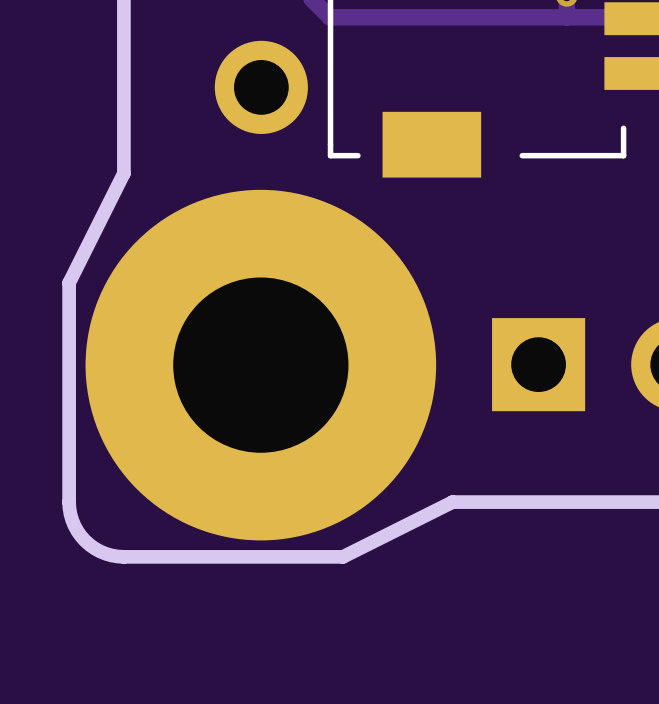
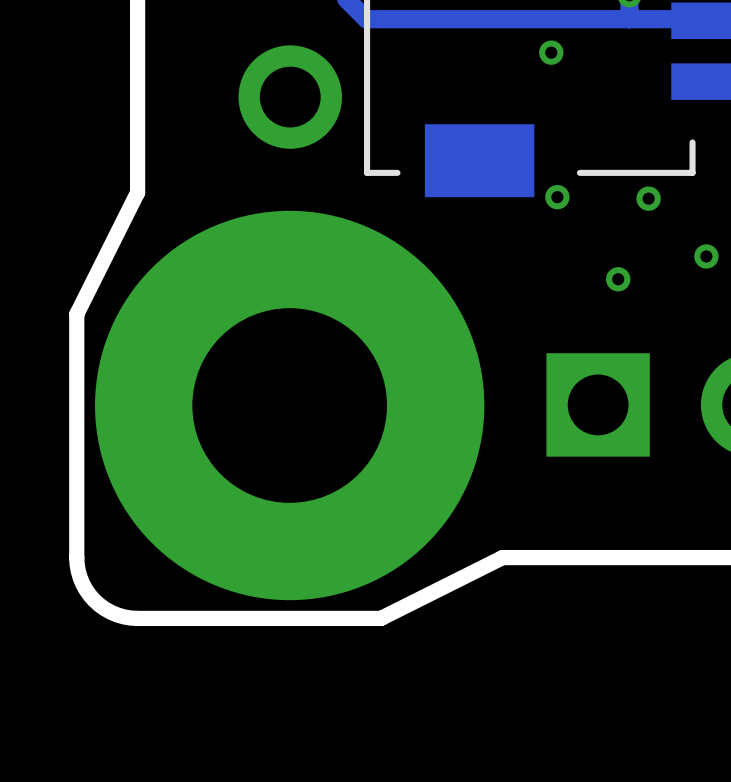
via: none -> (551, 52)
via: none -> (557, 197)
via: none -> (648, 198)
via: none -> (706, 256)
via: none -> (618, 279)

